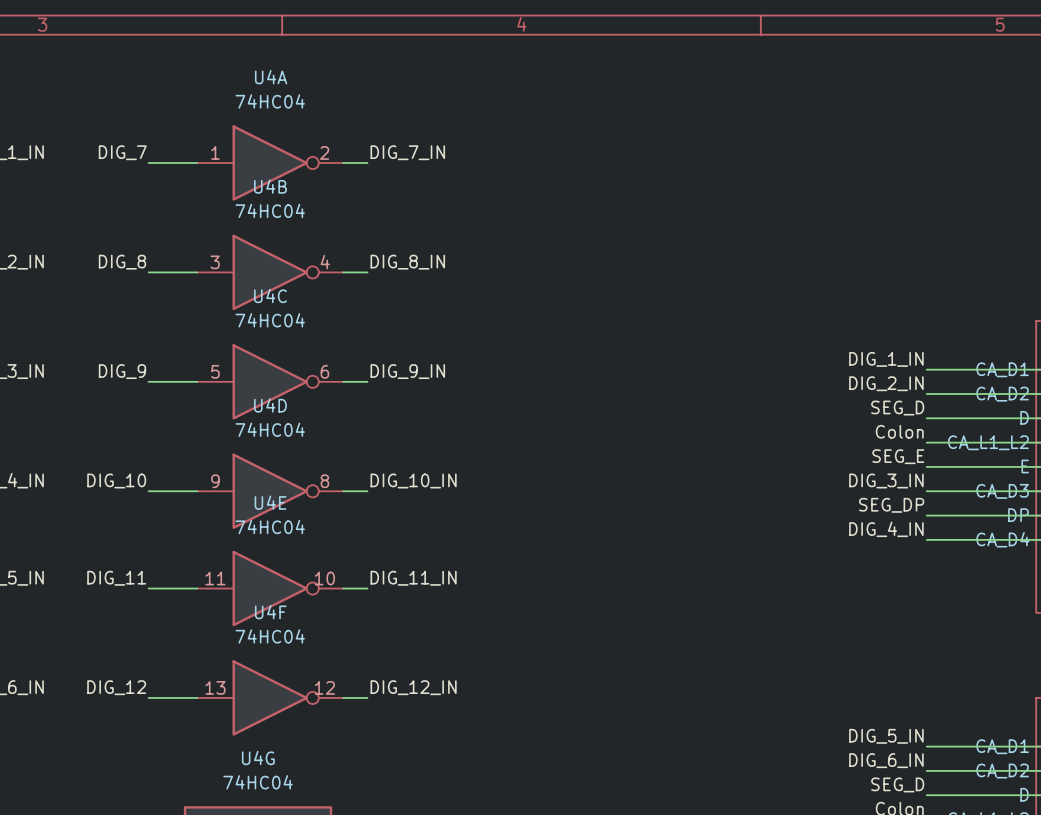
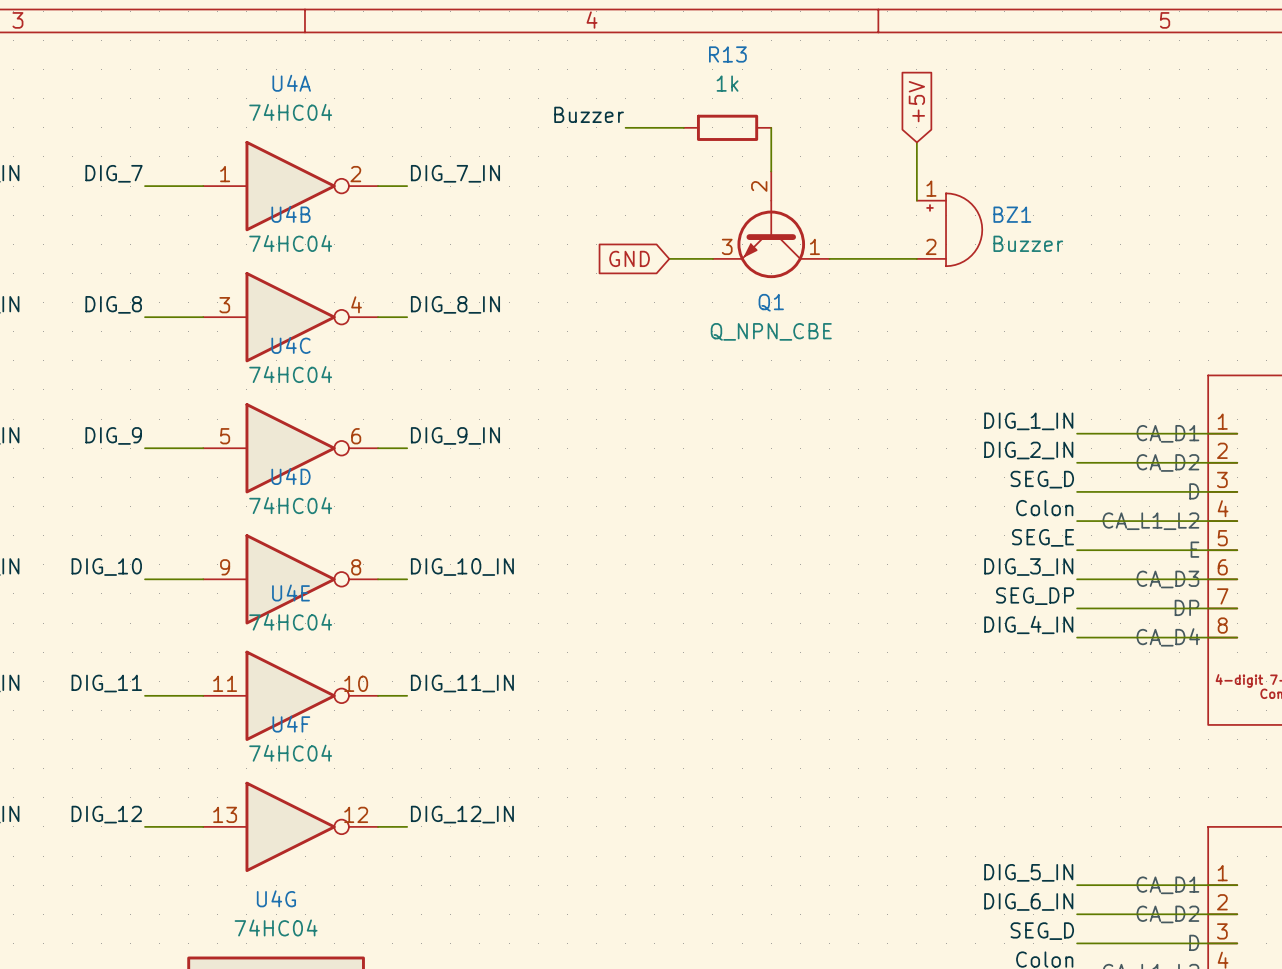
global label: none -> +5V (916, 101)
label: none -> Buzzer (589, 114)
wire: none -> (625, 127) (683, 127)
R13: none -> 1k (727, 127)
wire: none -> (771, 127) (771, 171)
wire: none -> (916, 142) (916, 200)
Q1: none -> Q_NPN_CBE (771, 224)
BZ1: none -> Buzzer (949, 229)
global label: none -> GND (629, 258)
wire: none -> (669, 258) (712, 258)
wire: none -> (829, 258) (916, 258)

